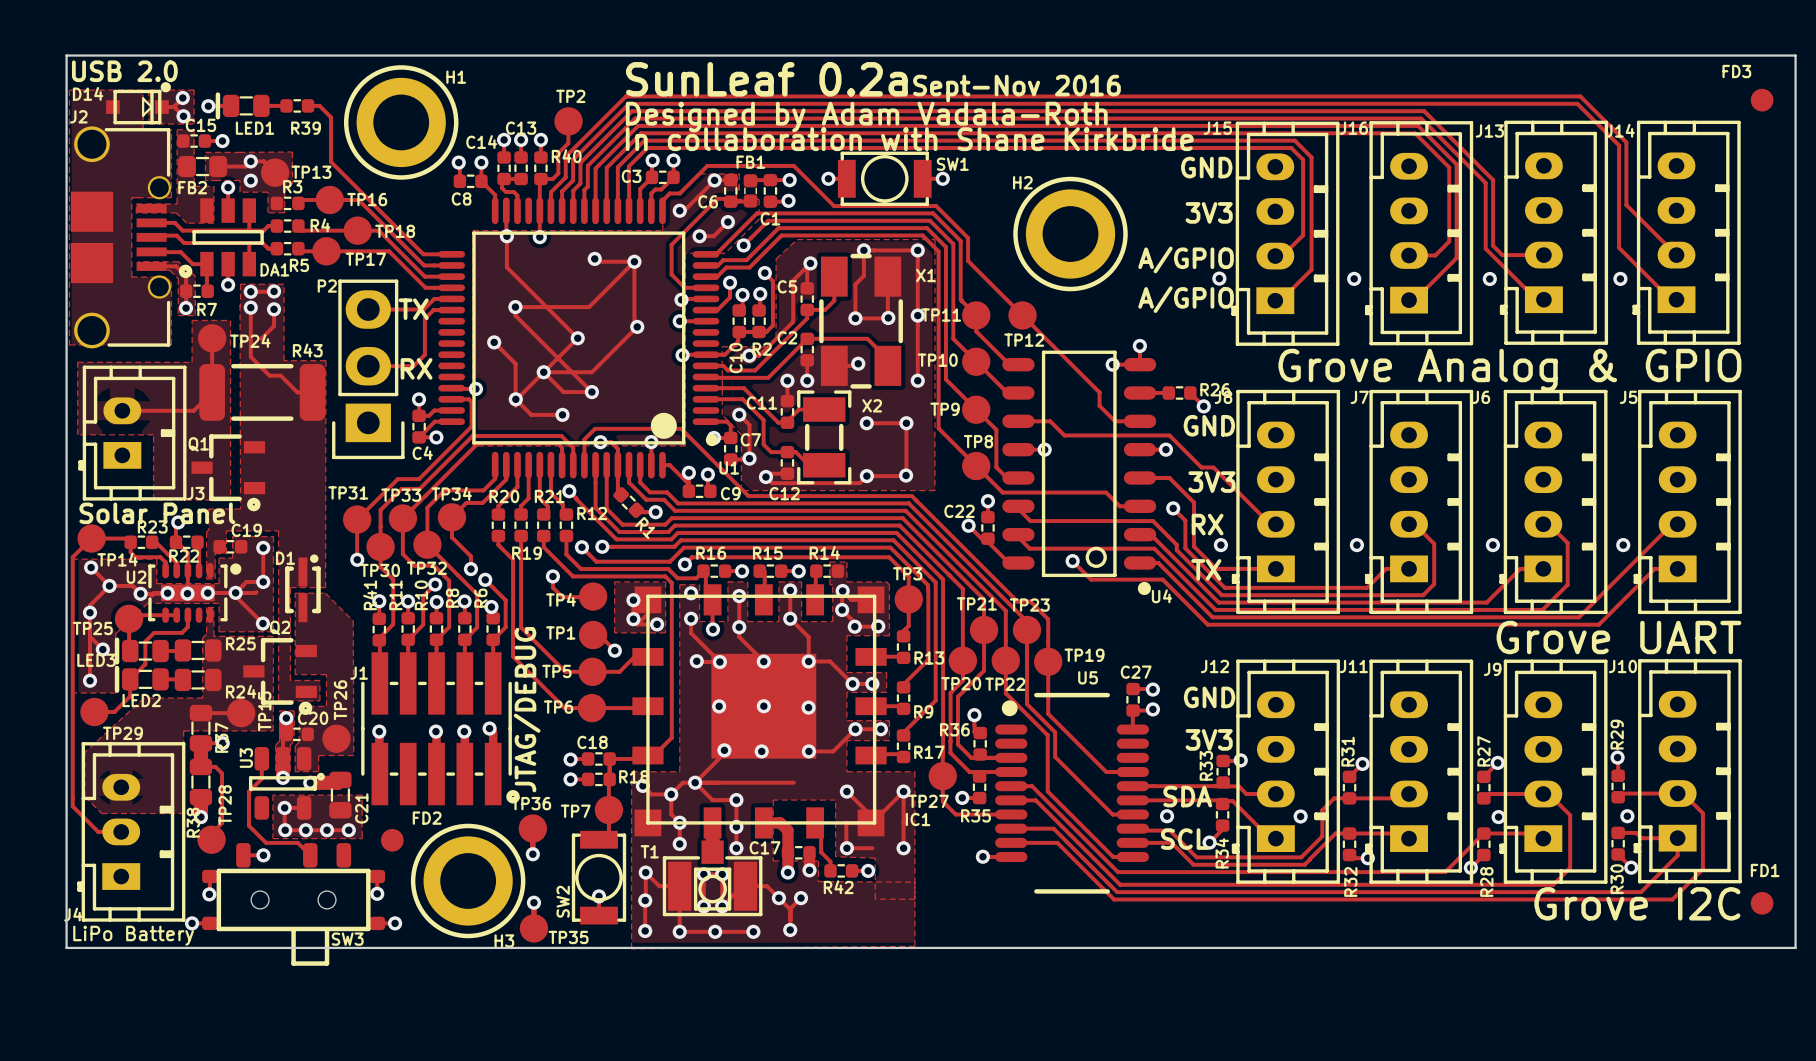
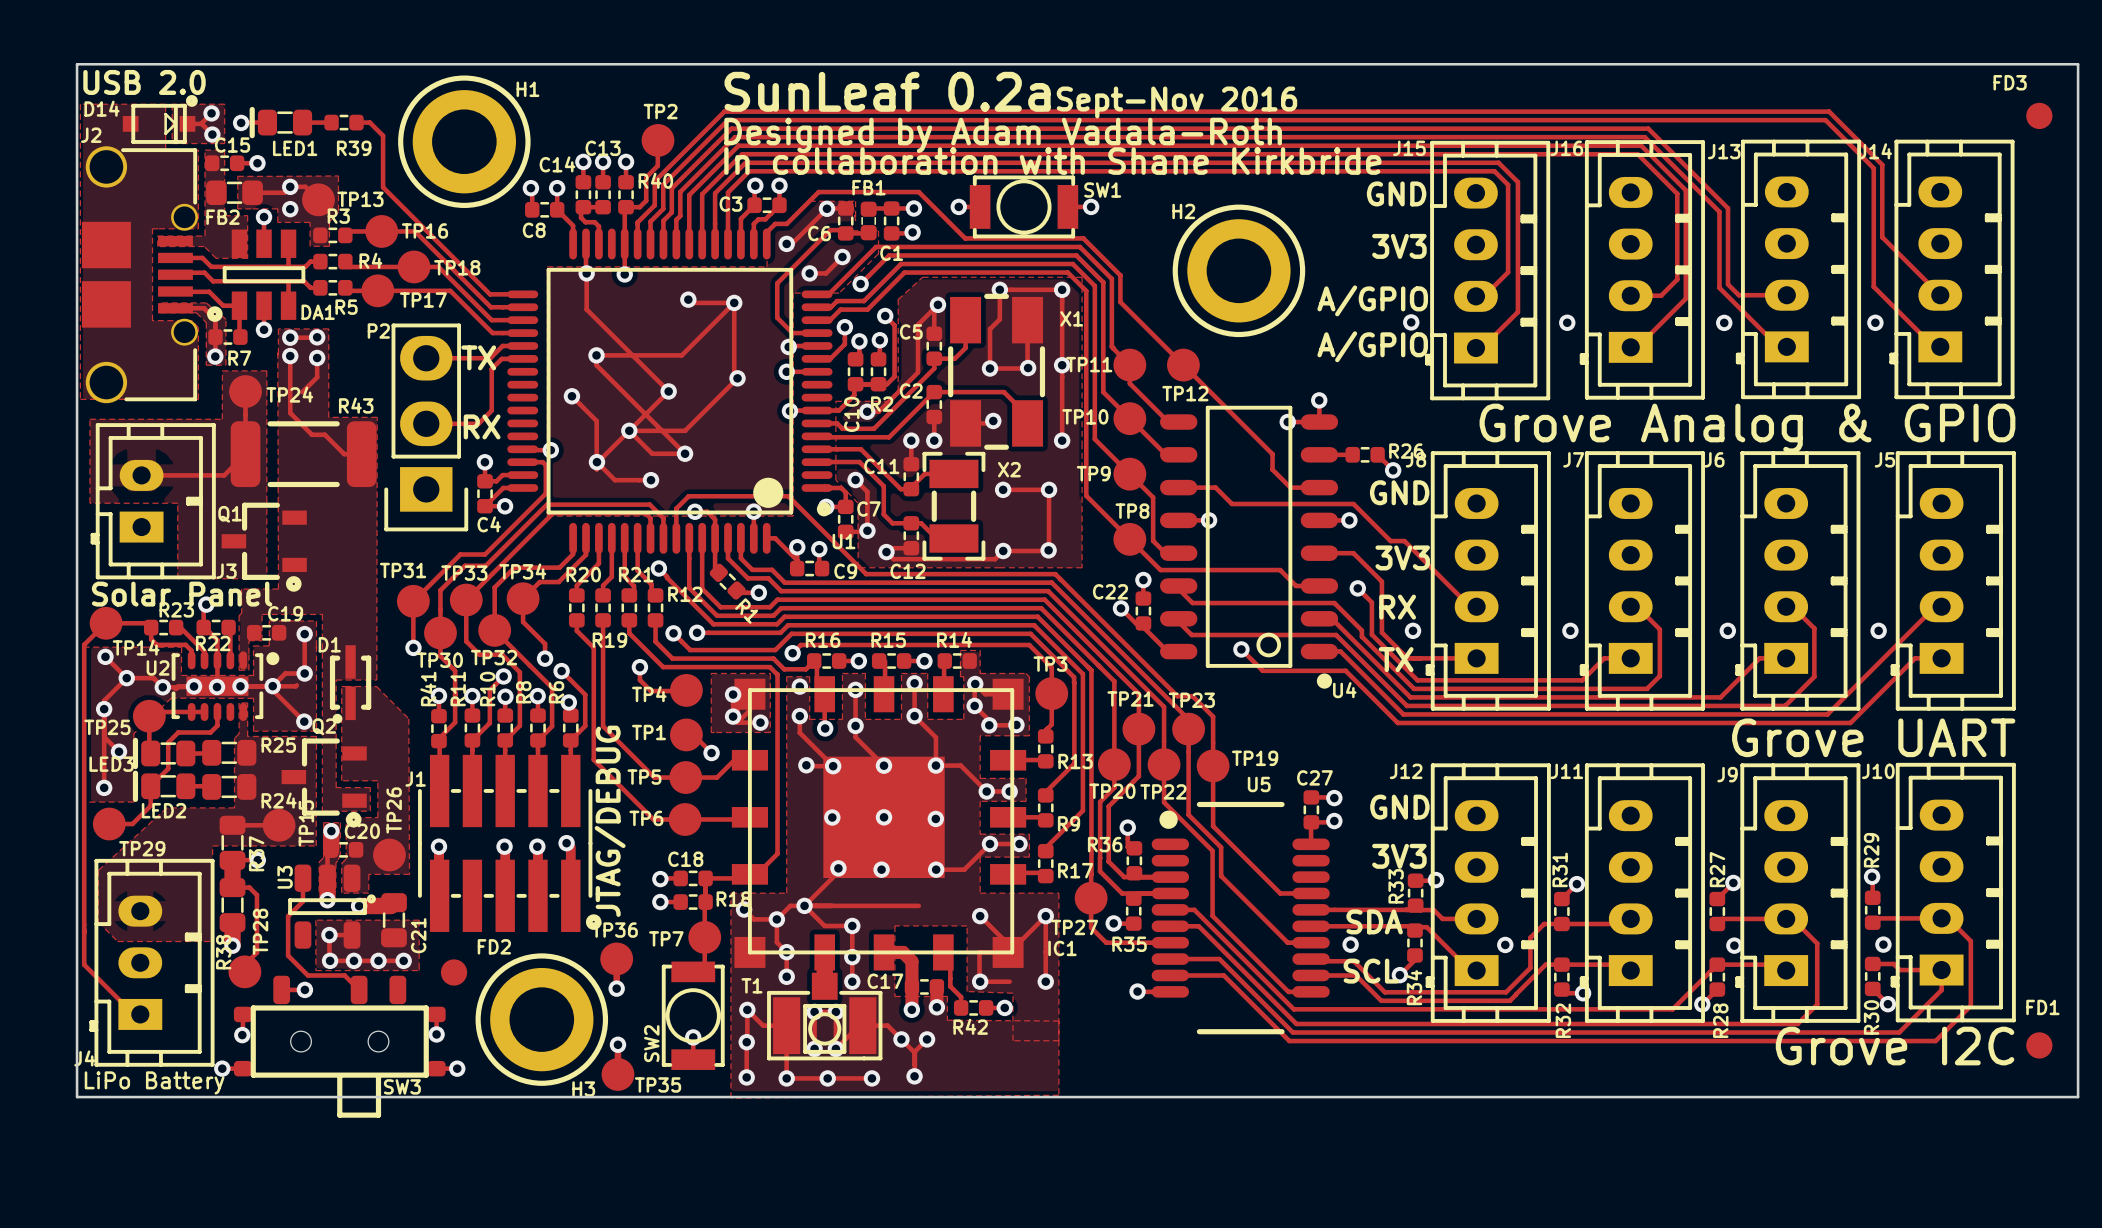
D1 rotation: 0° (302, 588) -> 180° (350, 684)
track: (72, 806) (98, 831) (121, 831) -> (84, 933) (84, 964) (133, 1014) (140, 1014)

